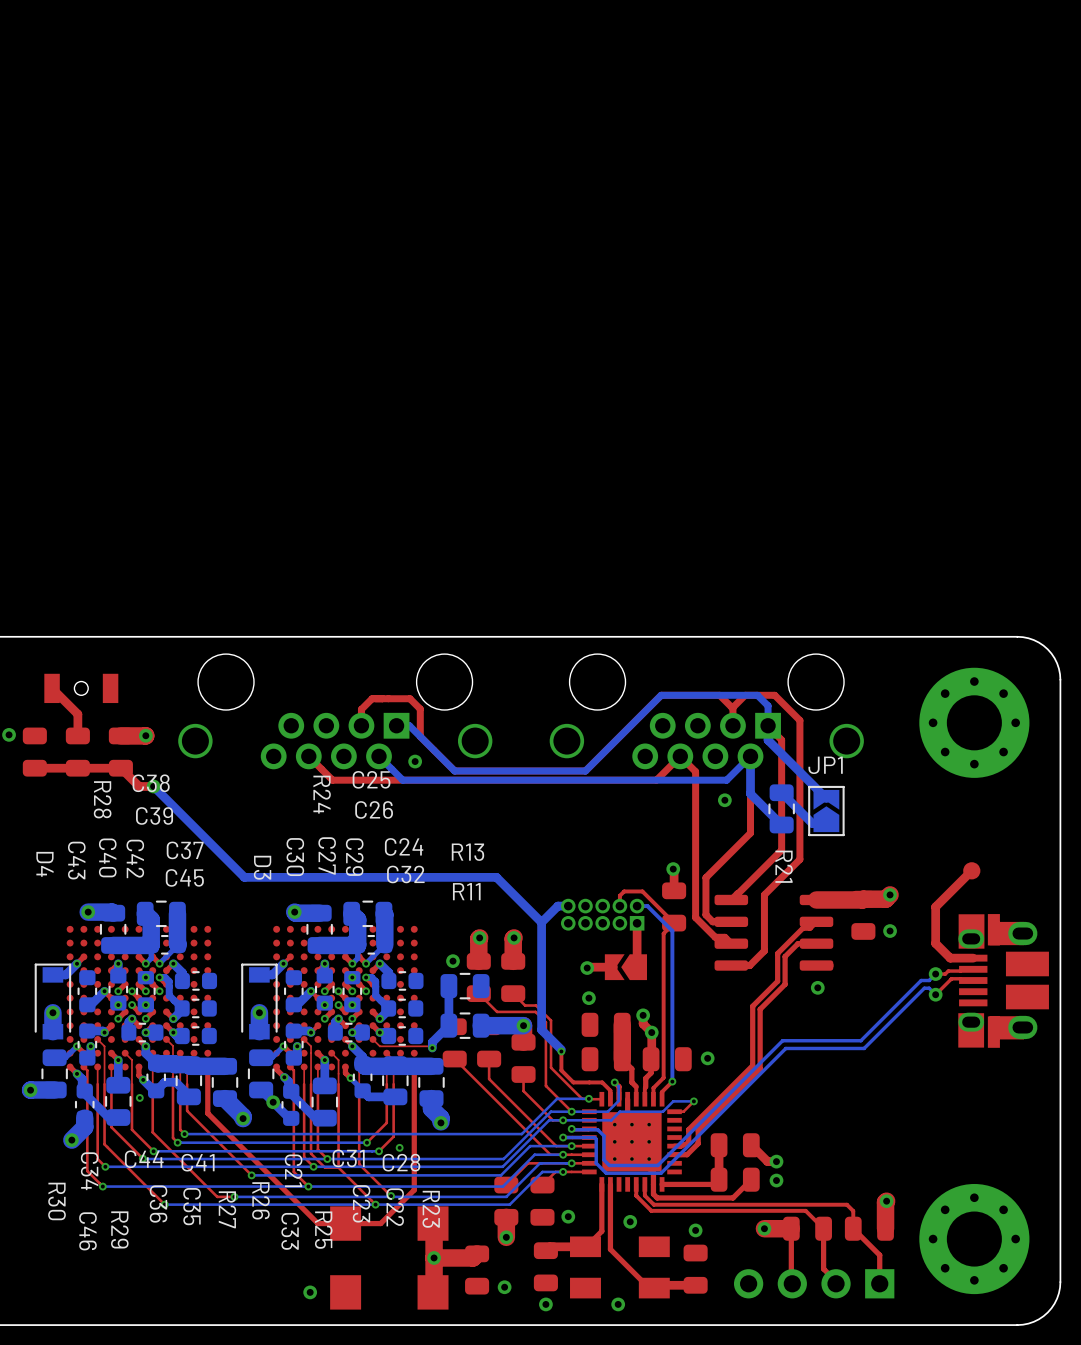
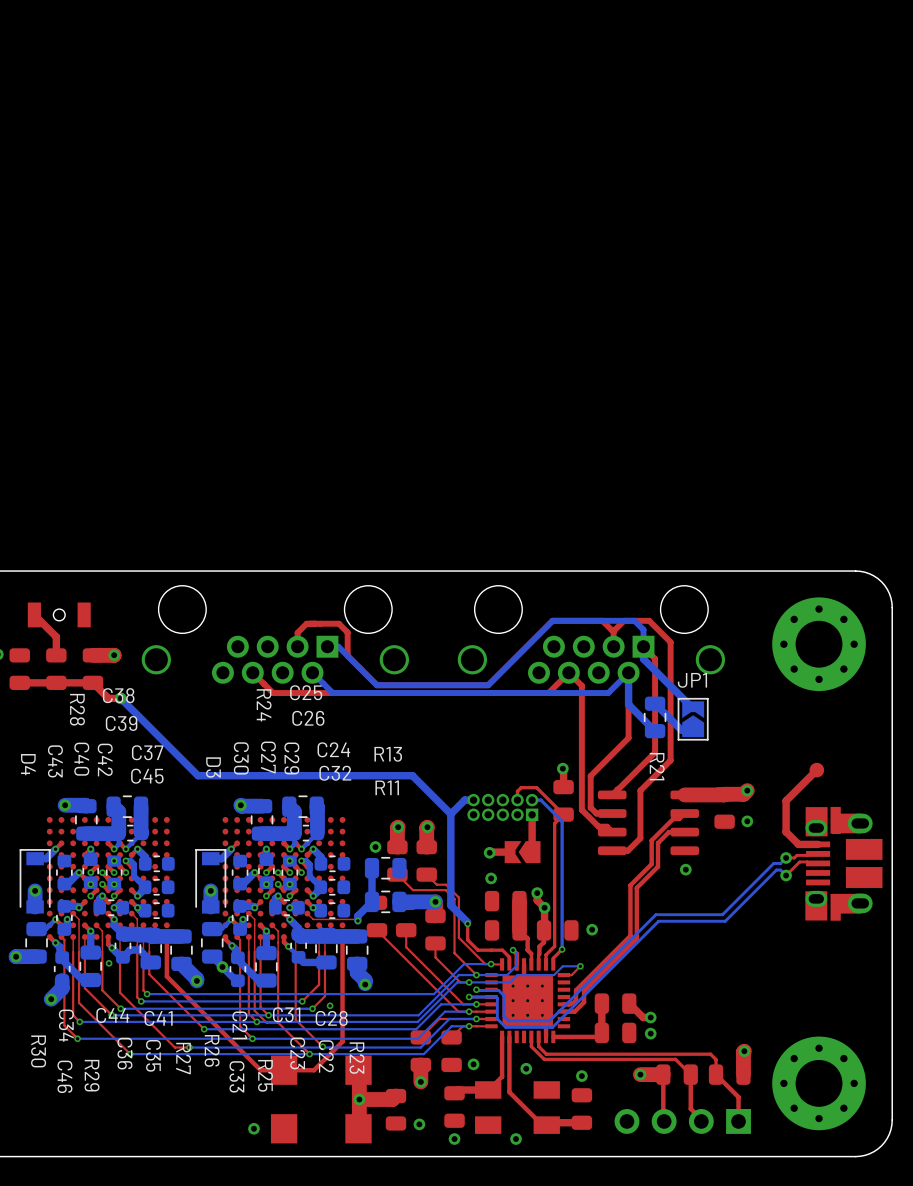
via: (415, 761) -> none
via: (724, 800) -> none
top track: (751, 1179) (733, 1197) (657, 1197) (653, 1194) (653, 1184) -> none

